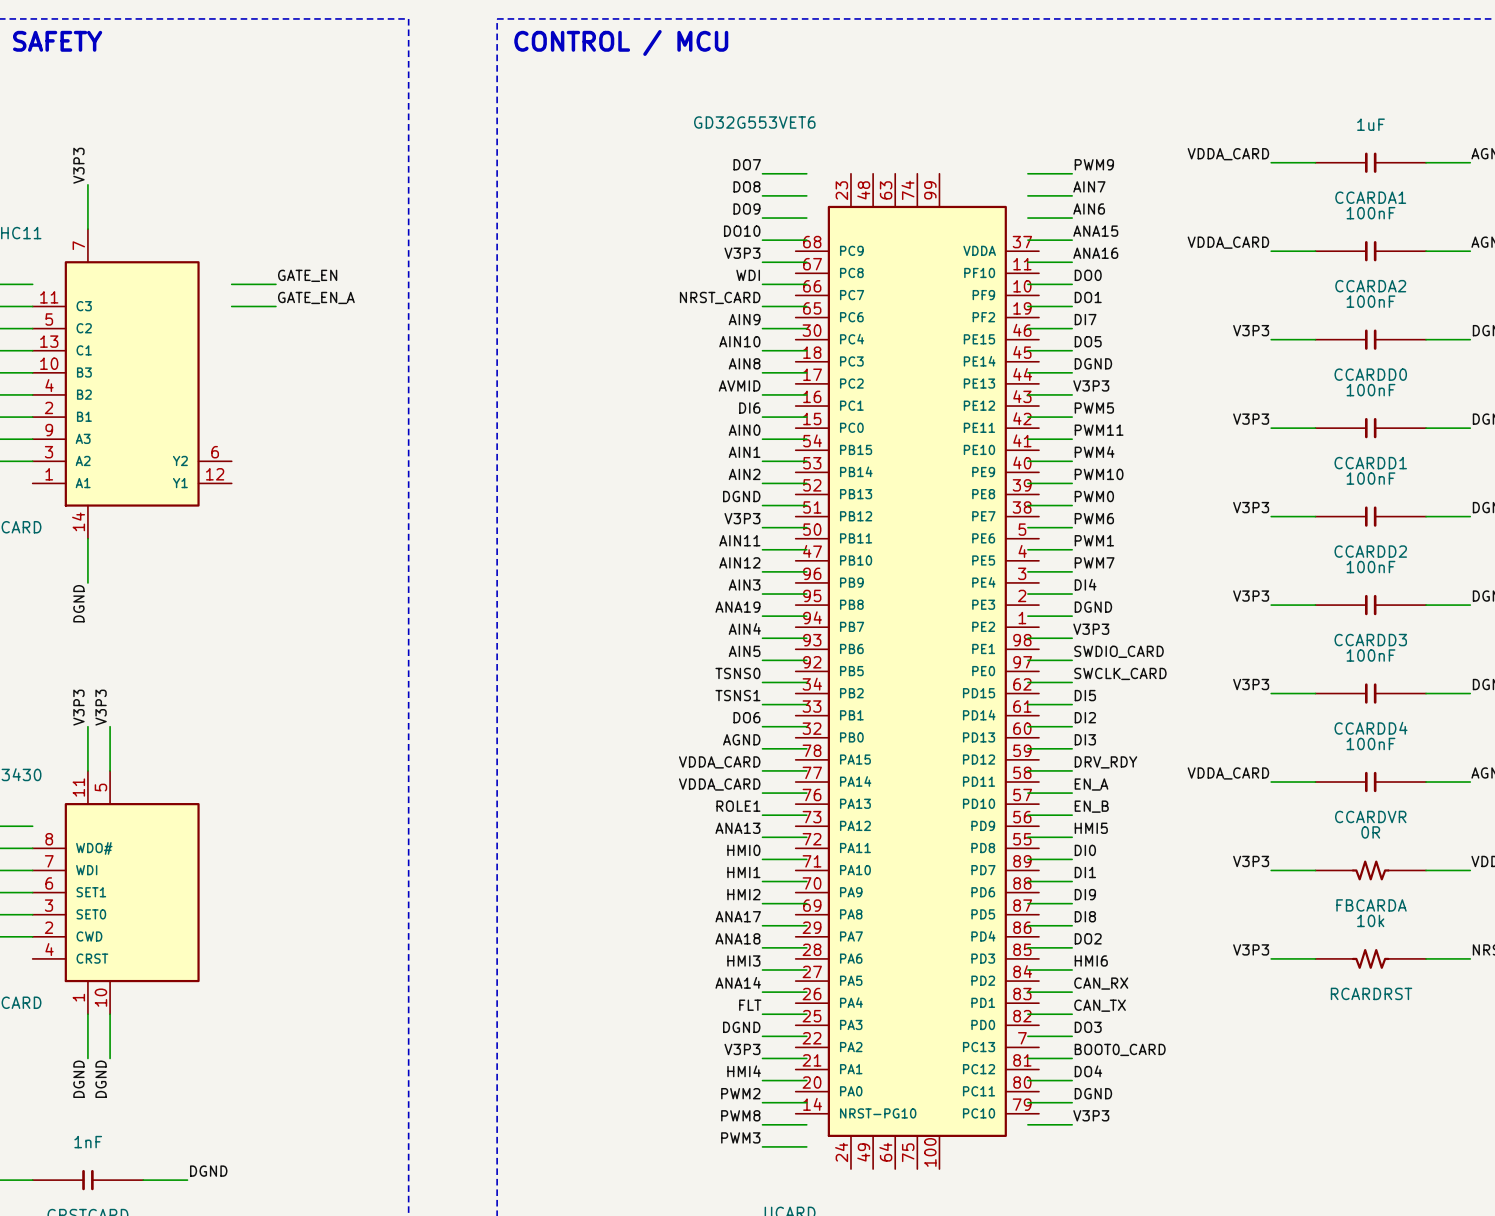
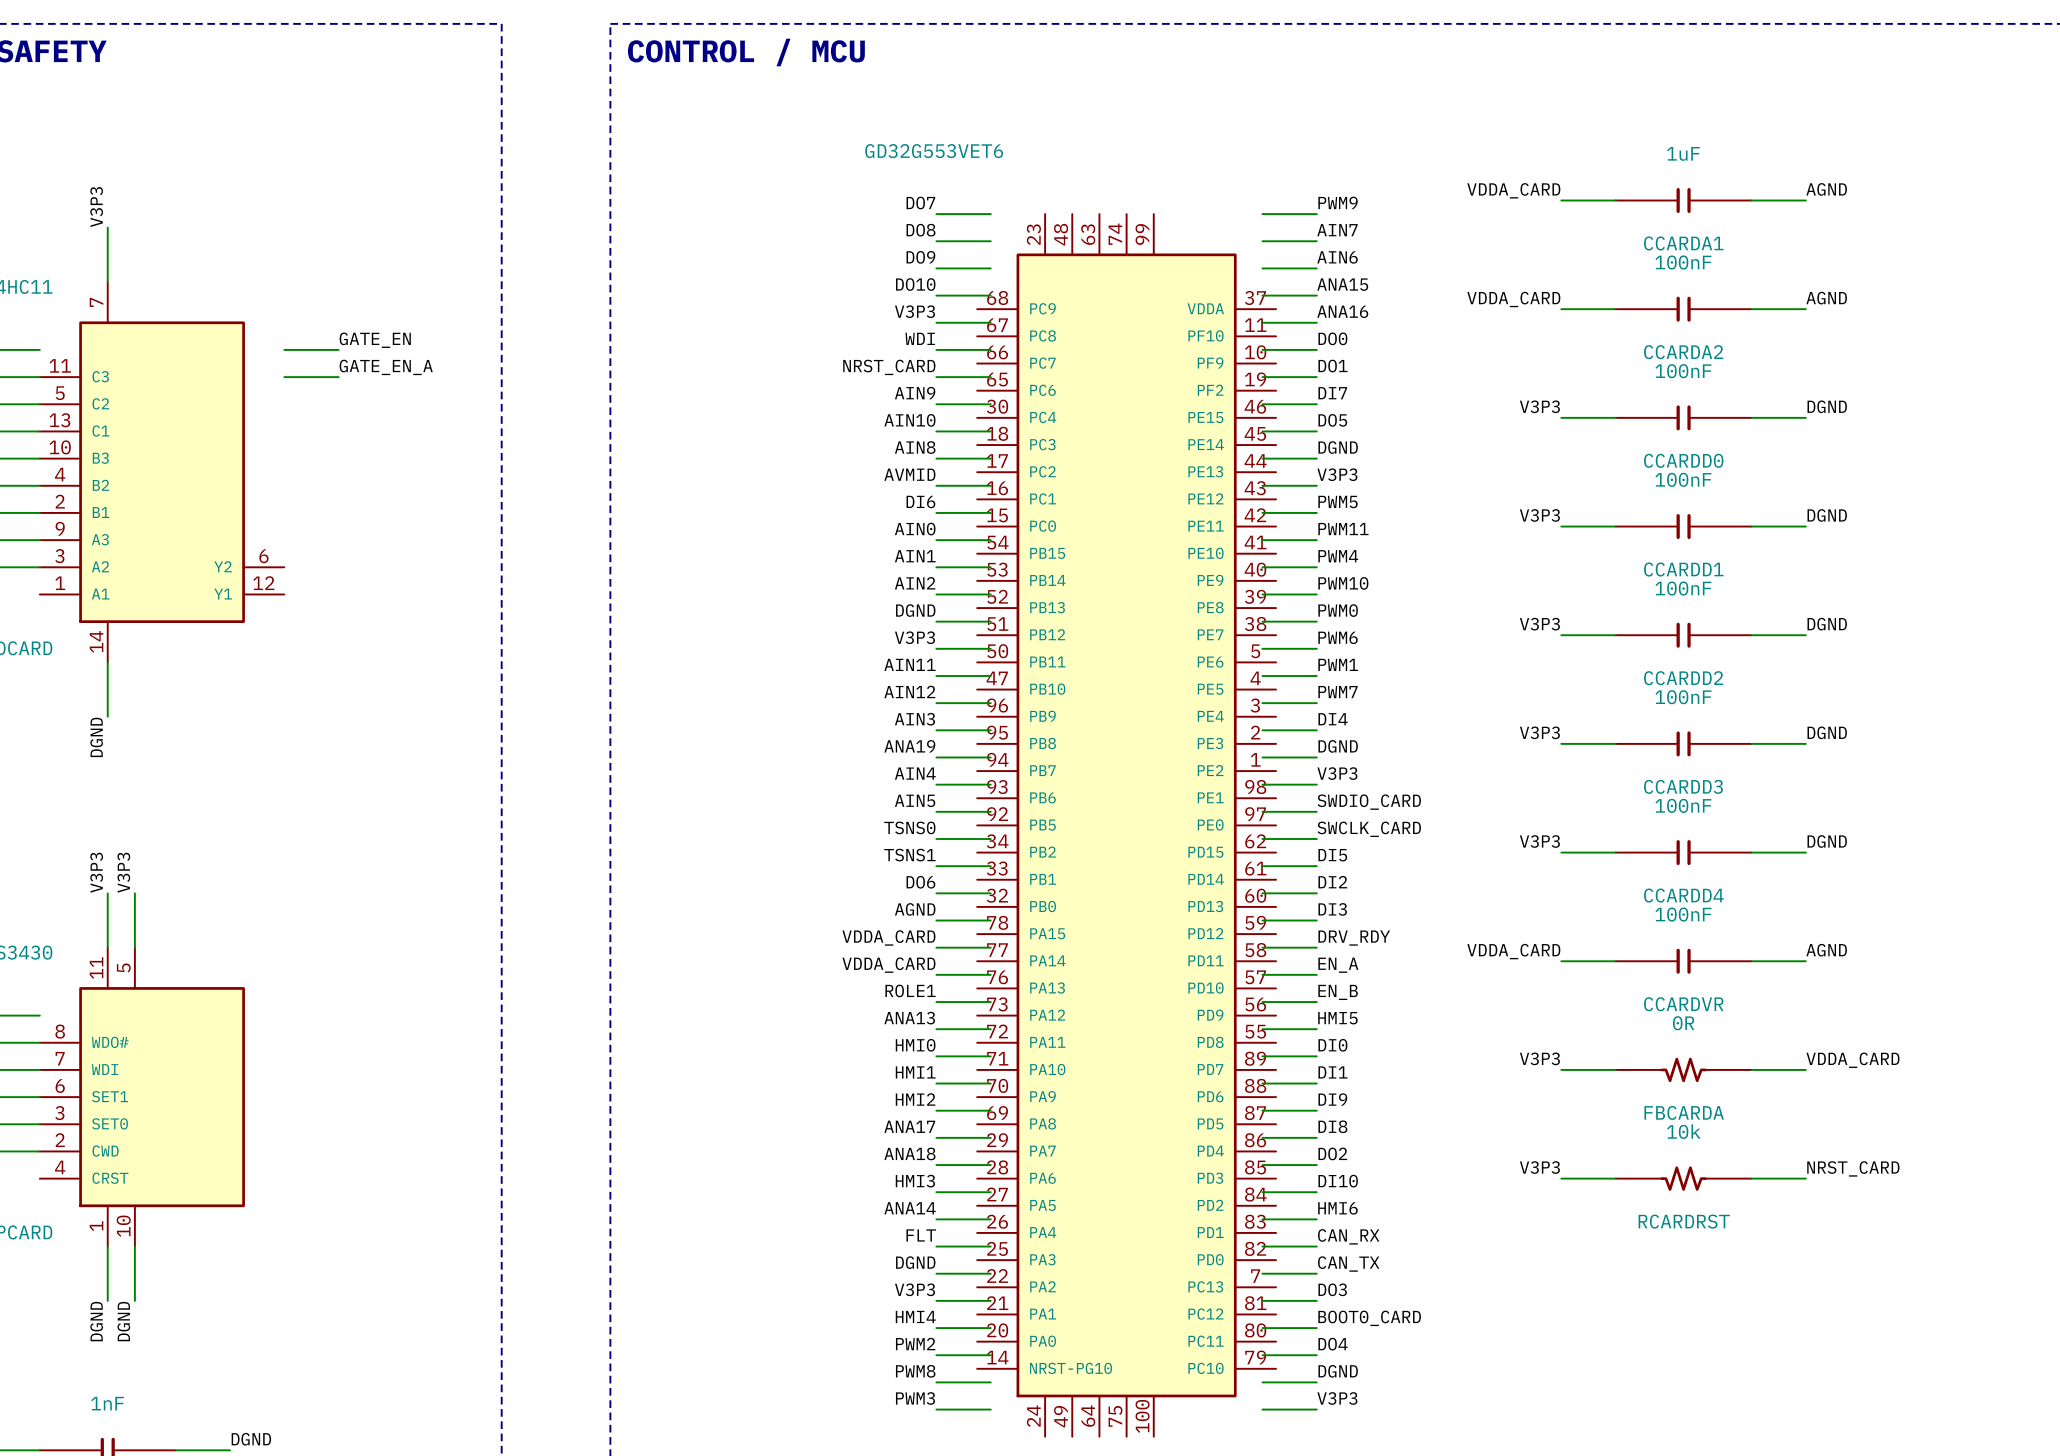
label: HMI6 (1091, 960) -> DI10 (1338, 1181)
label: CAN_RX (1101, 983) -> HMI6 (1337, 1208)
label: CAN_TX (1100, 1005) -> CAN_RX (1348, 1236)
label: DO3 (1088, 1027) -> CAN_TX (1348, 1264)
label: BOOT0_CARD (1120, 1049) -> DO3 (1332, 1289)
label: DO4 (1088, 1071) -> BOOT0_CARD (1369, 1318)
label: DGND (1093, 1093) -> DO4 (1333, 1344)
label: V3P3 (1091, 1115) -> DGND (1338, 1371)
label: none -> V3P3 (1337, 1398)
wire: none -> (1262, 1409) (1316, 1409)

